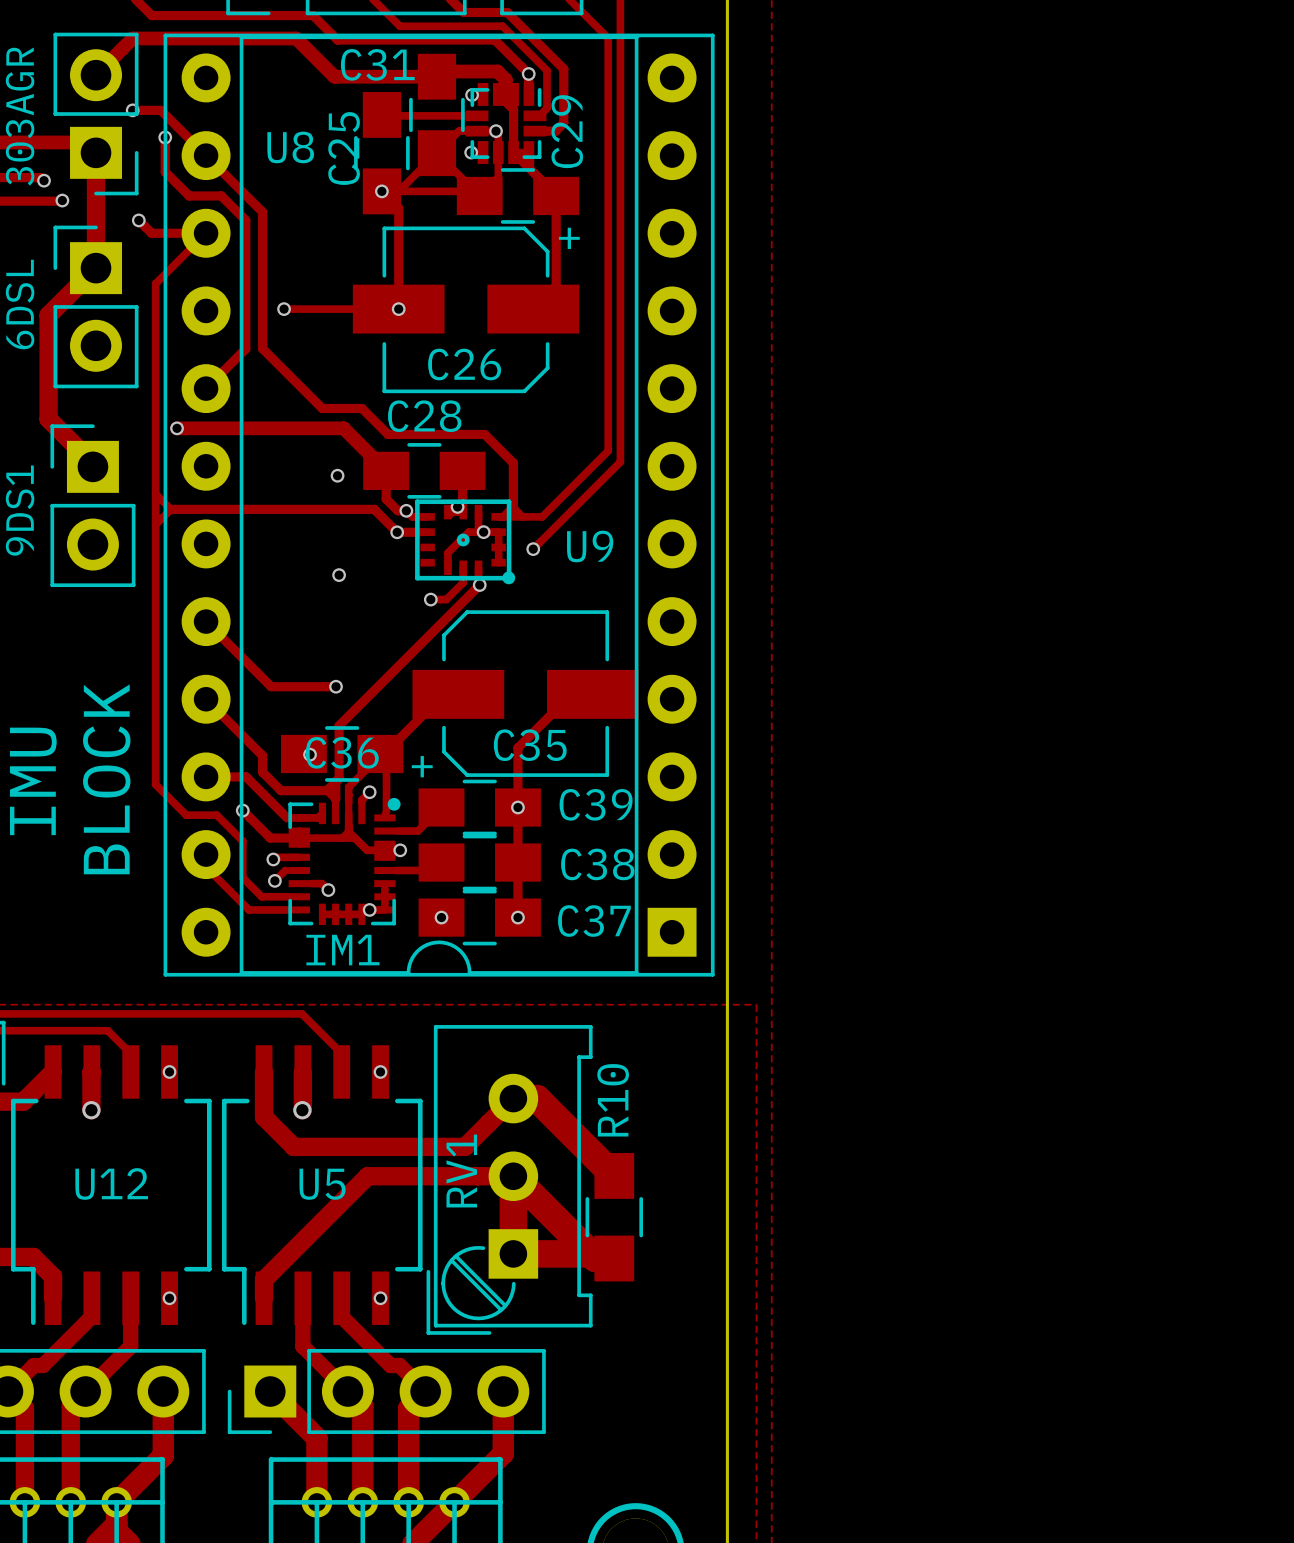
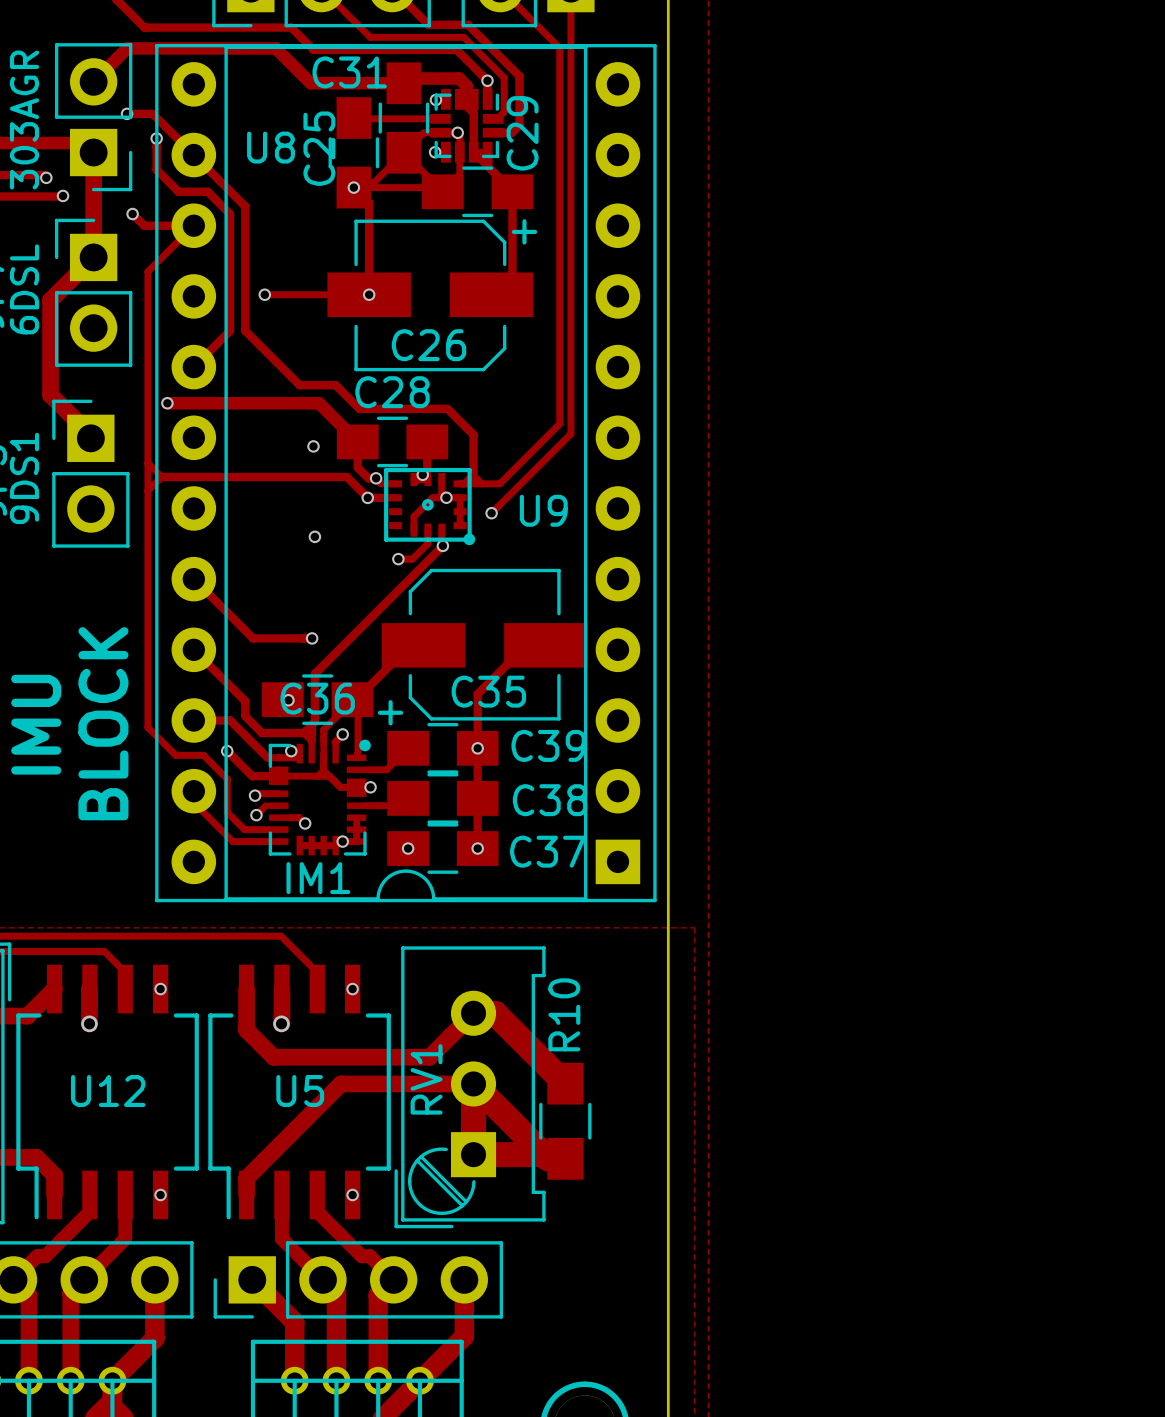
via: none -> (291, 751)

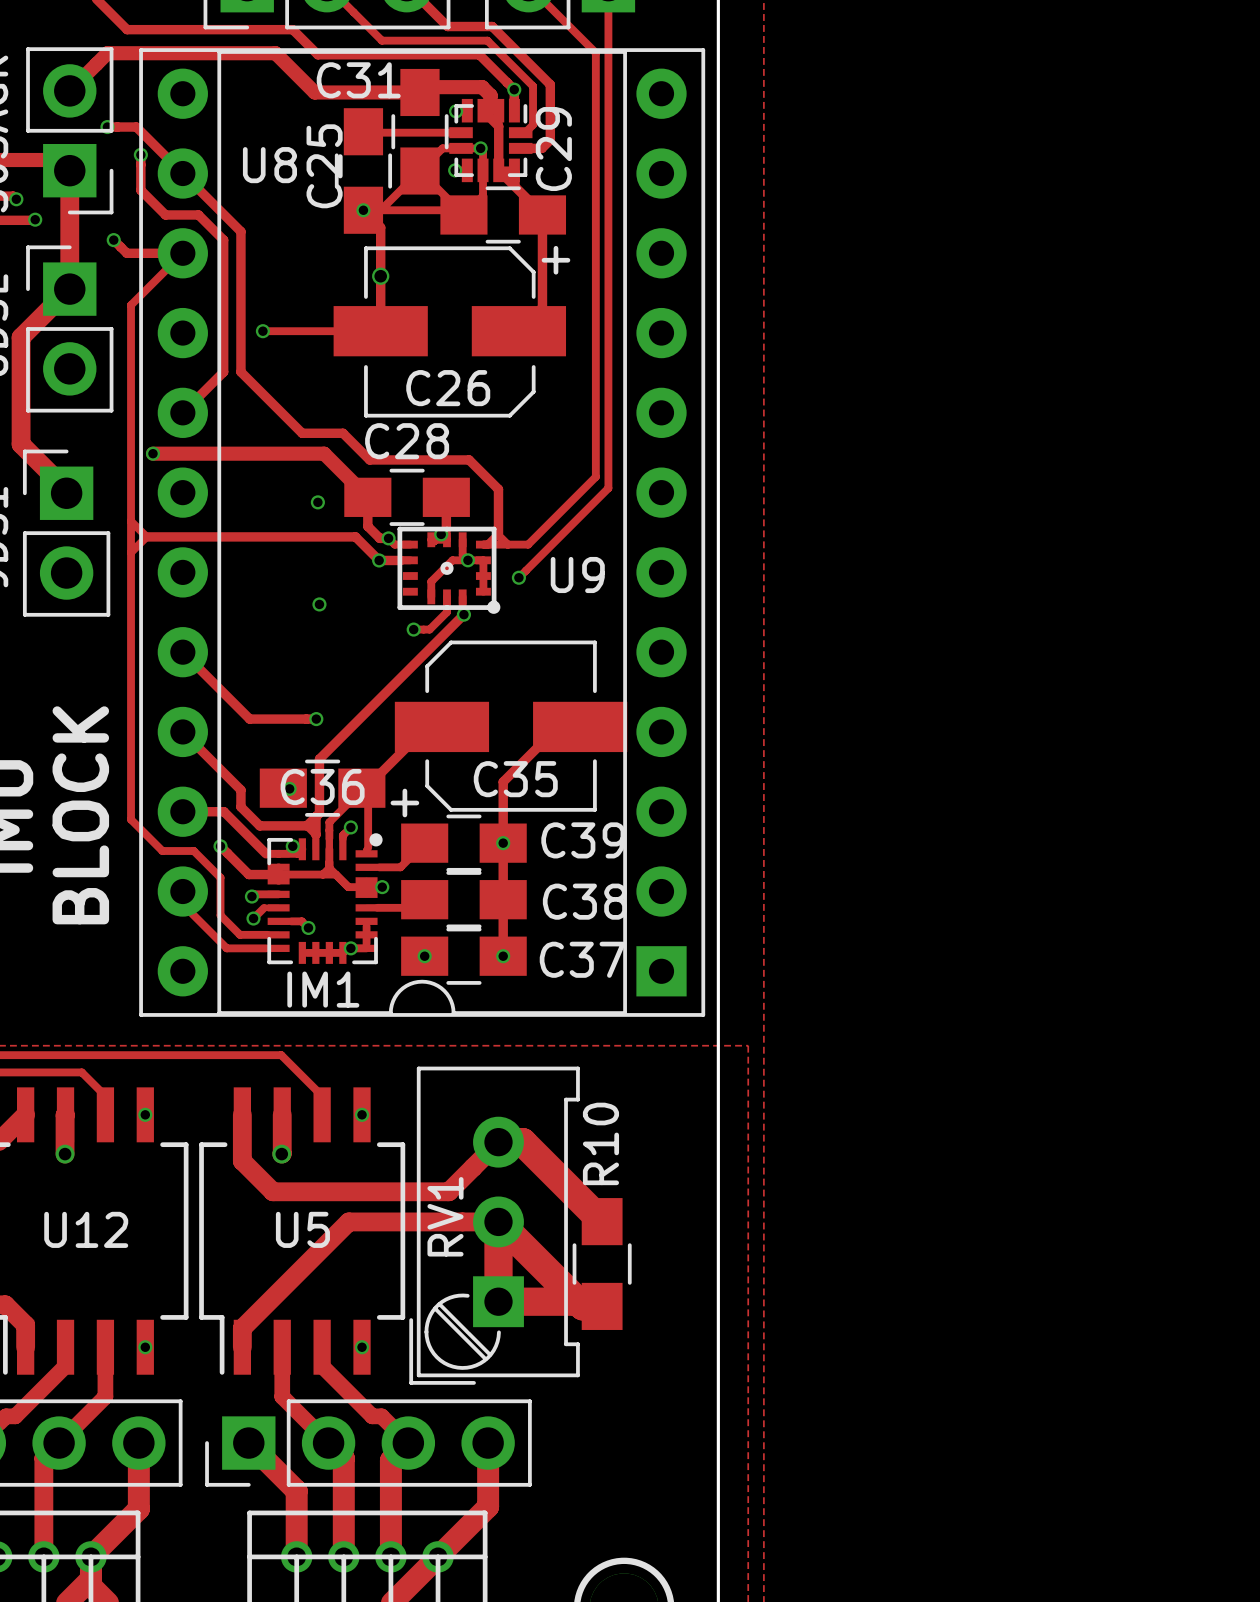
via: none -> (380, 276)
via: (369, 294) -> none

